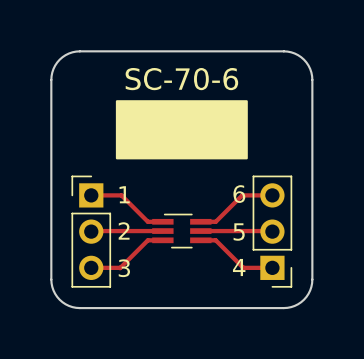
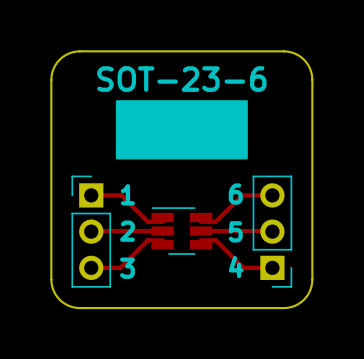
text: SC-70-6 (181, 79) -> SOT-23-6 (181, 79)
part footprint: [152, 213, 212, 249] -> [151, 207, 213, 255]

